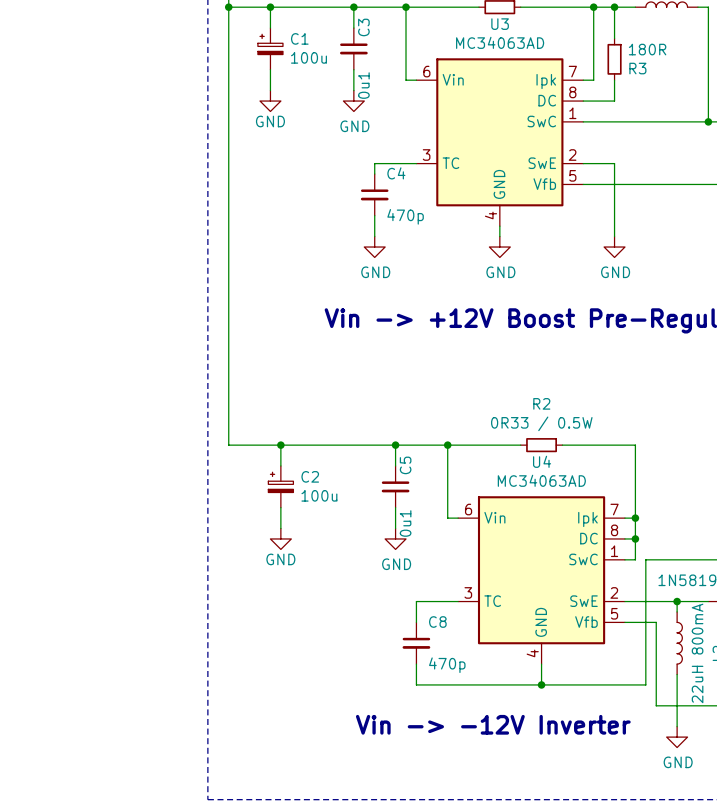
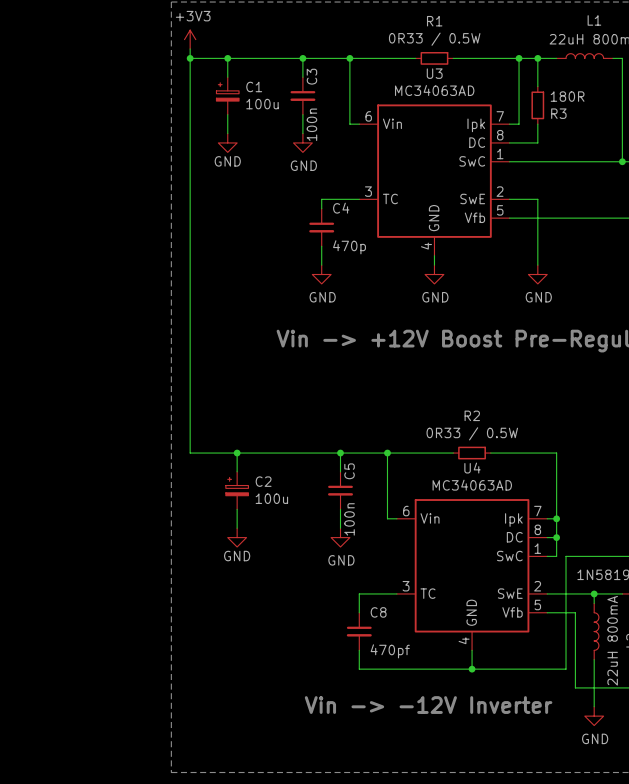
C3 value: 0u1 (363, 85) -> 100n (311, 124)
C5 value: 0u1 (405, 523) -> 100n (349, 519)
C8 value: 470p (447, 665) -> 470pf (390, 651)

